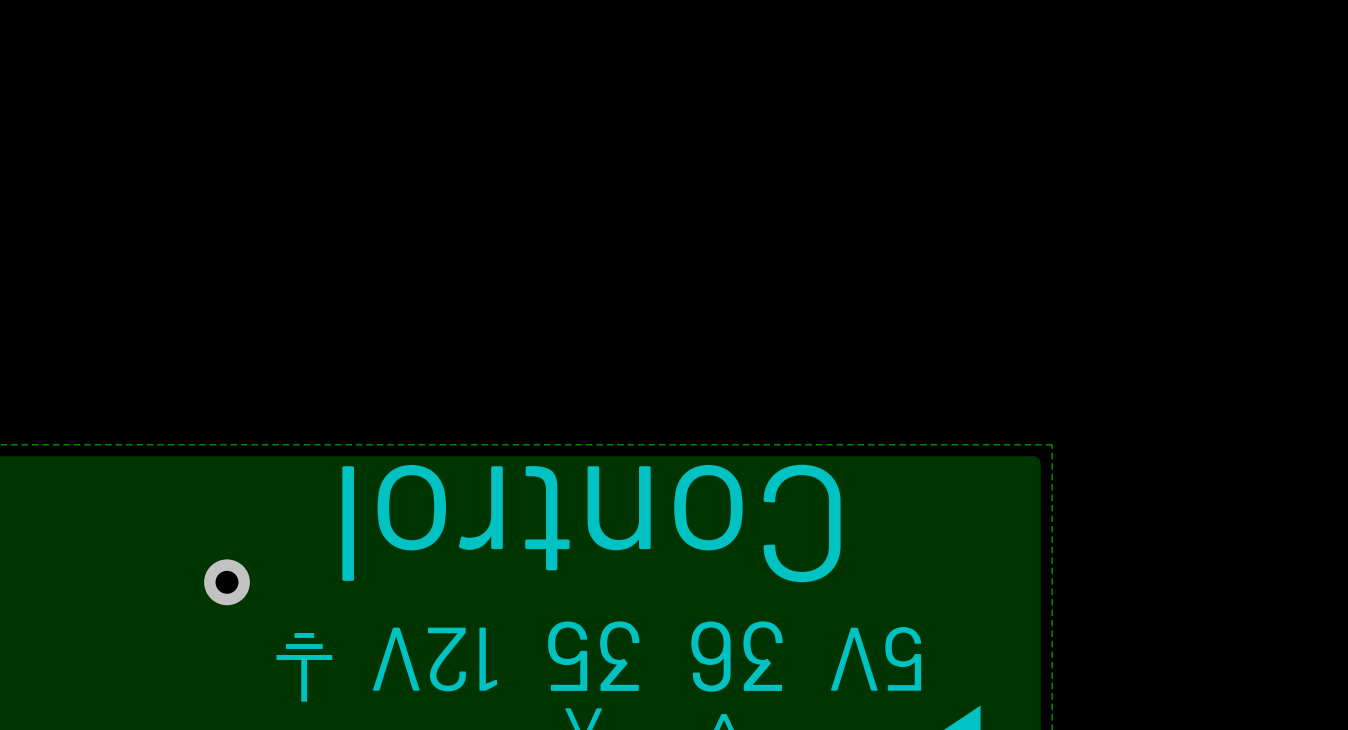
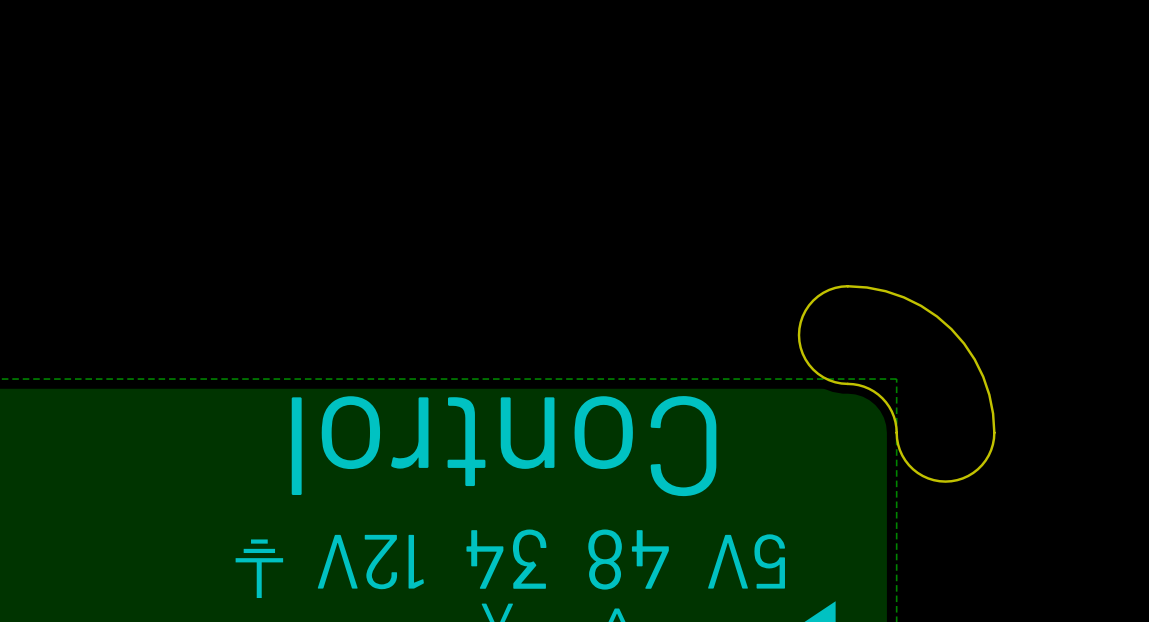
board edge: none -> (847, 286) (835, 287) (823, 292) (813, 300) (805, 310) (800, 322) (798, 335) (802, 353) (809, 364) (818, 373) (829, 380) (863, 386) (882, 398) (893, 416) (898, 444) (902, 455) (917, 472) (933, 480) (945, 481) (957, 480) (973, 472) (985, 460) (991, 450) (994, 432) (993, 413) (983, 376) (964, 343) (951, 329) (921, 305) (885, 291) (847, 286)
via: (226, 582) -> none
text: 35 (593, 656) -> 34 (506, 559)
text: 36 (737, 656) -> 48 (628, 559)

